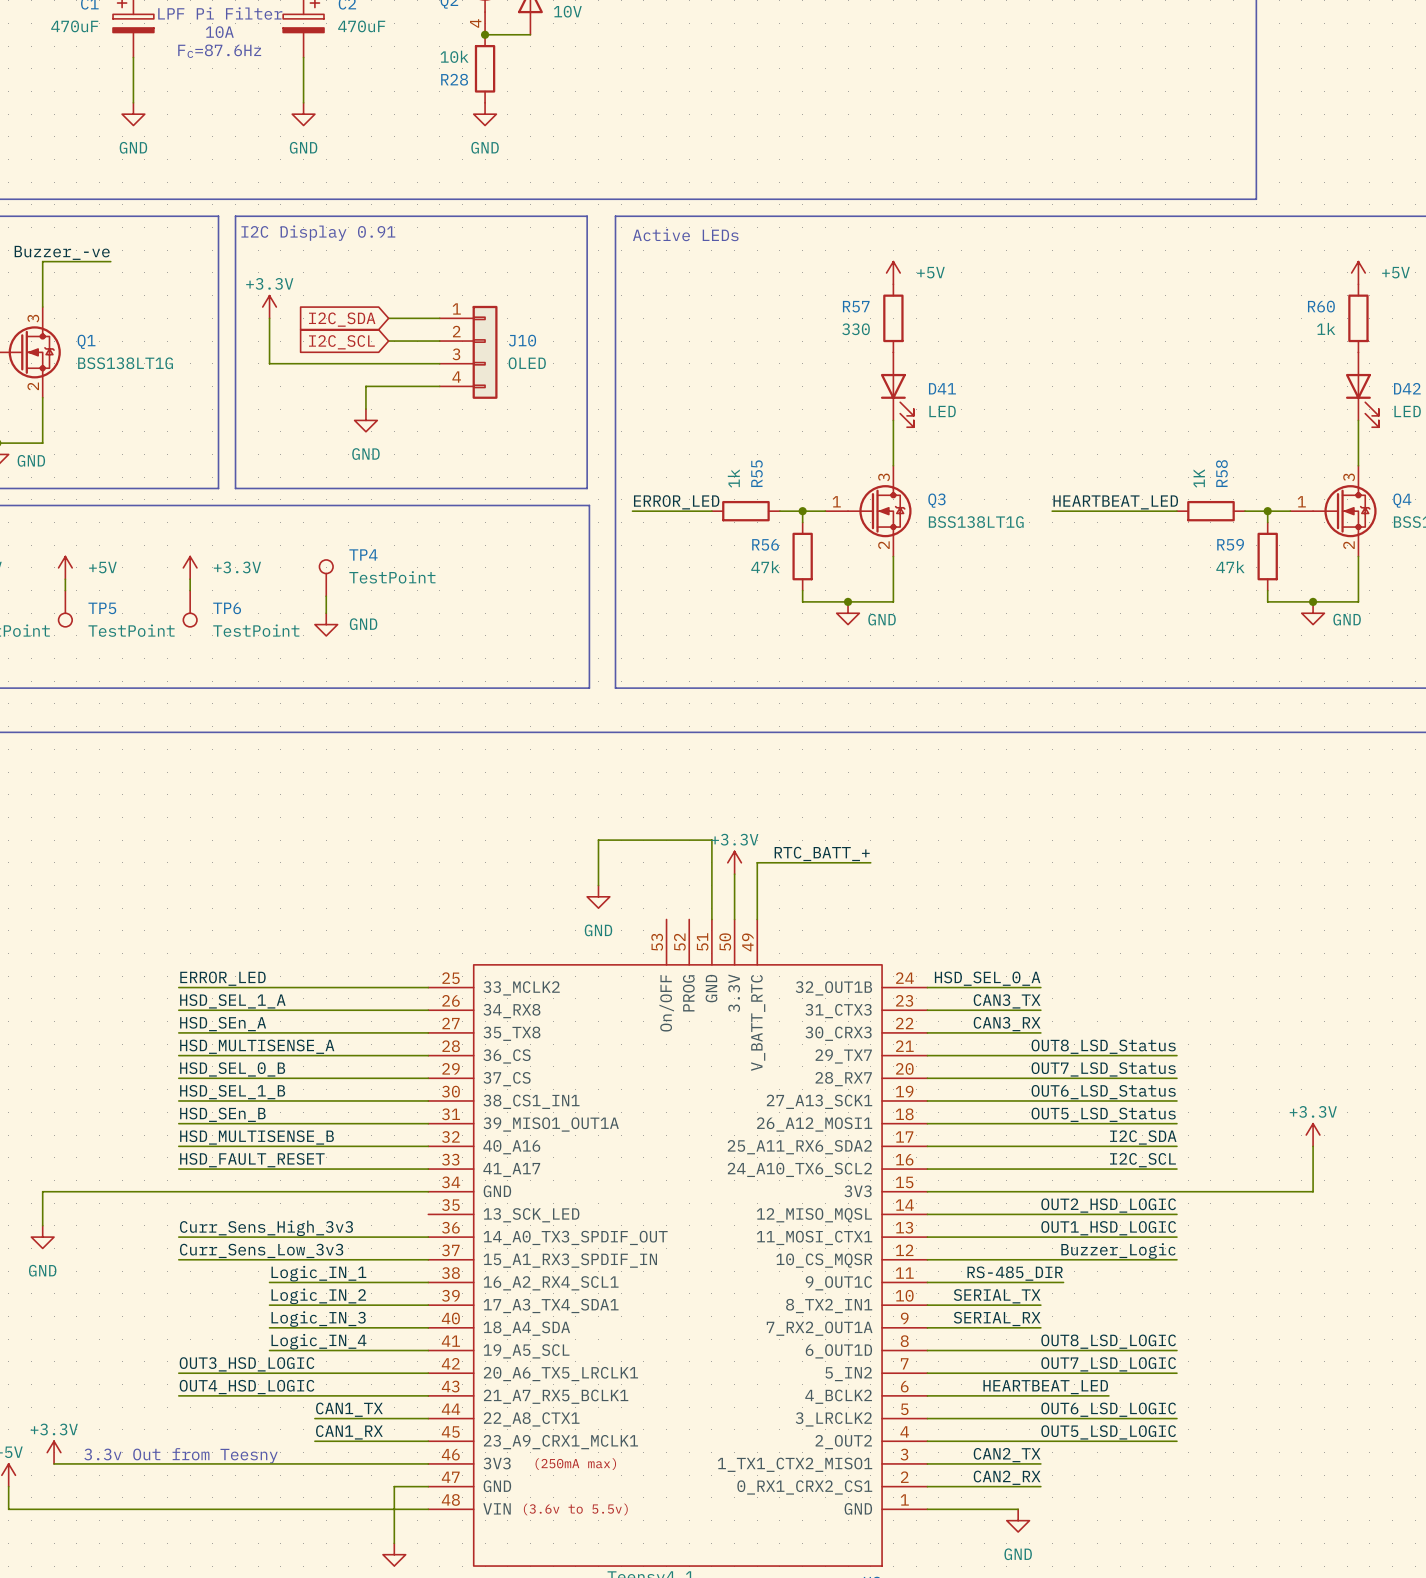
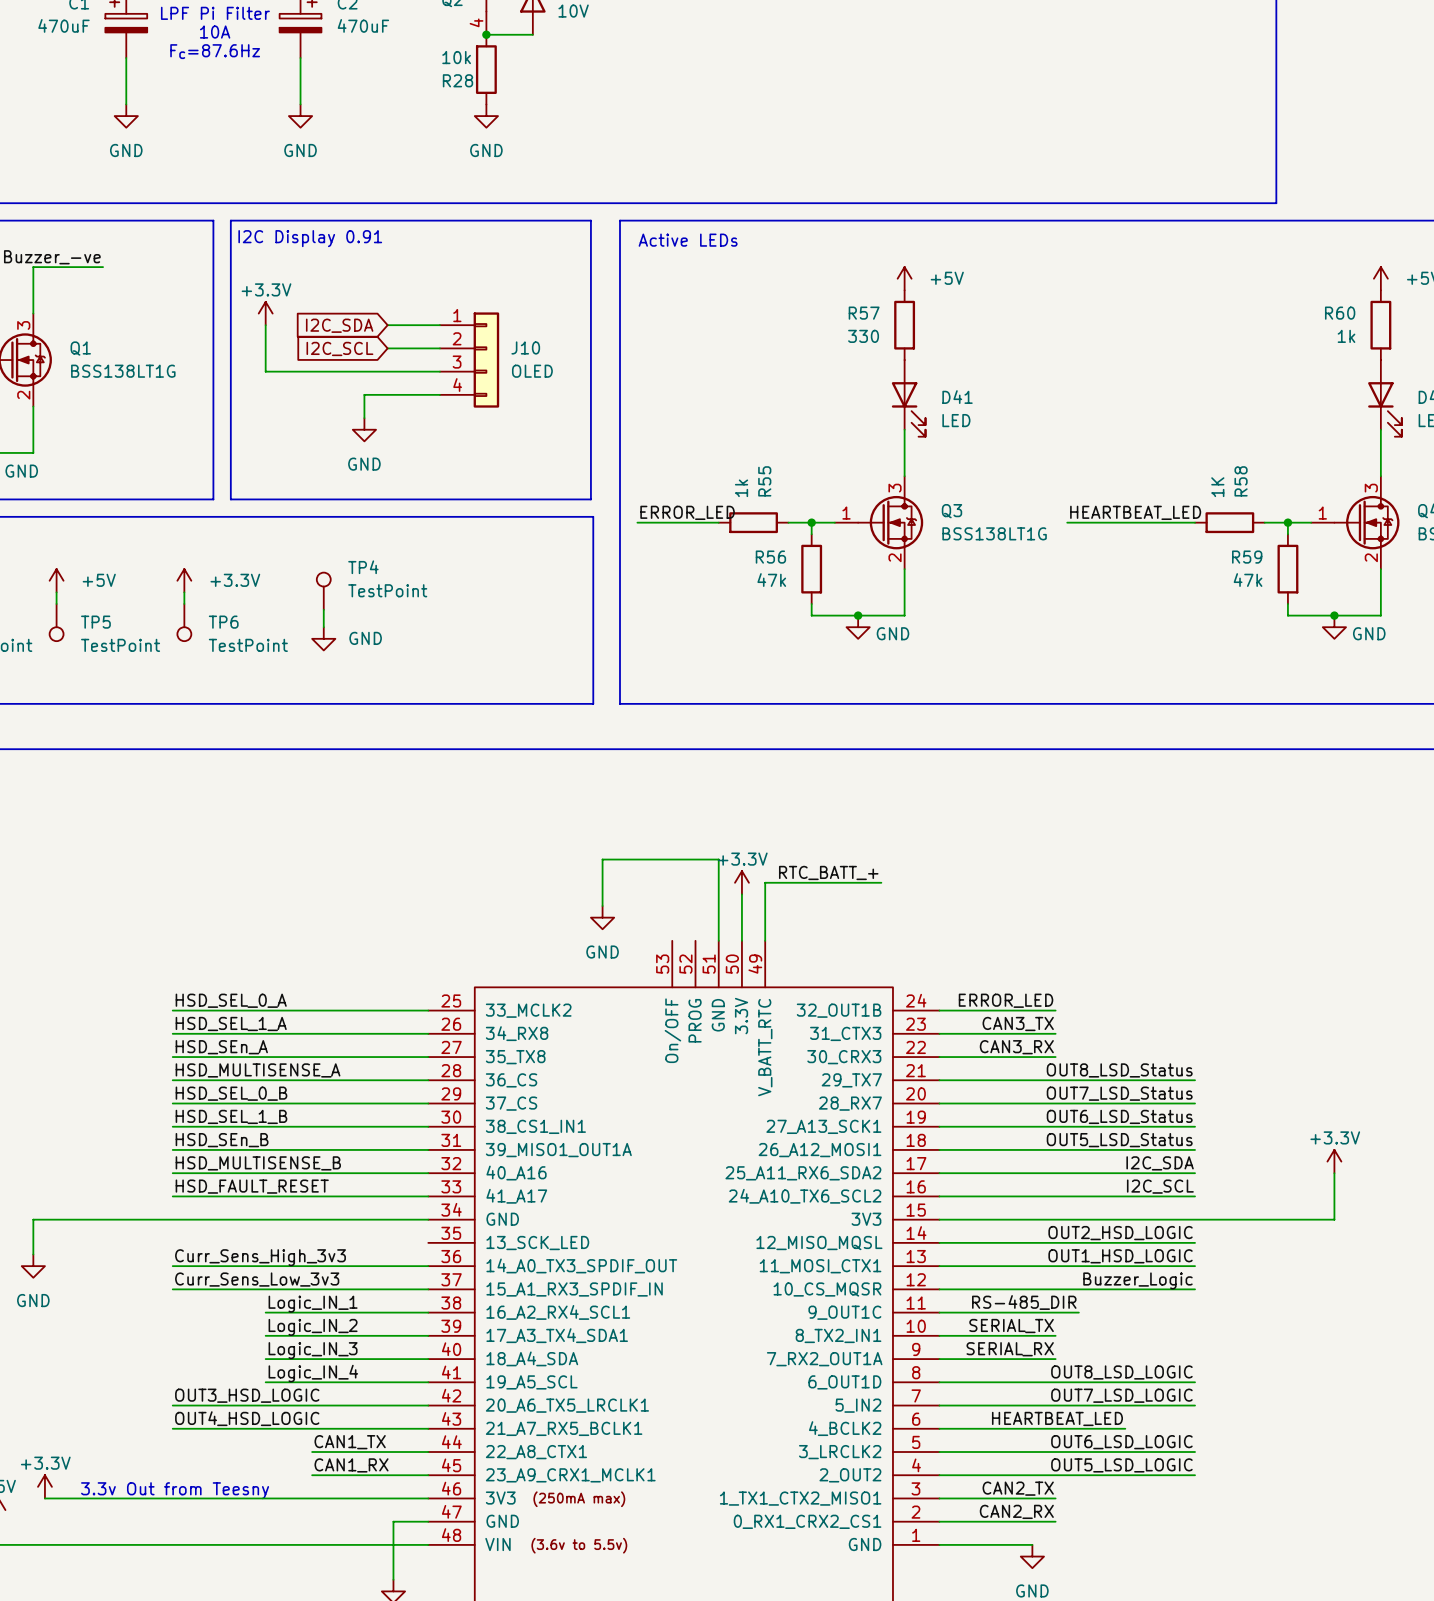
label: ERROR_LED (222, 978) -> HSD_SEL_0_A (231, 1000)
label: HSD_SEL_0_A (987, 978) -> ERROR_LED (1006, 1000)

